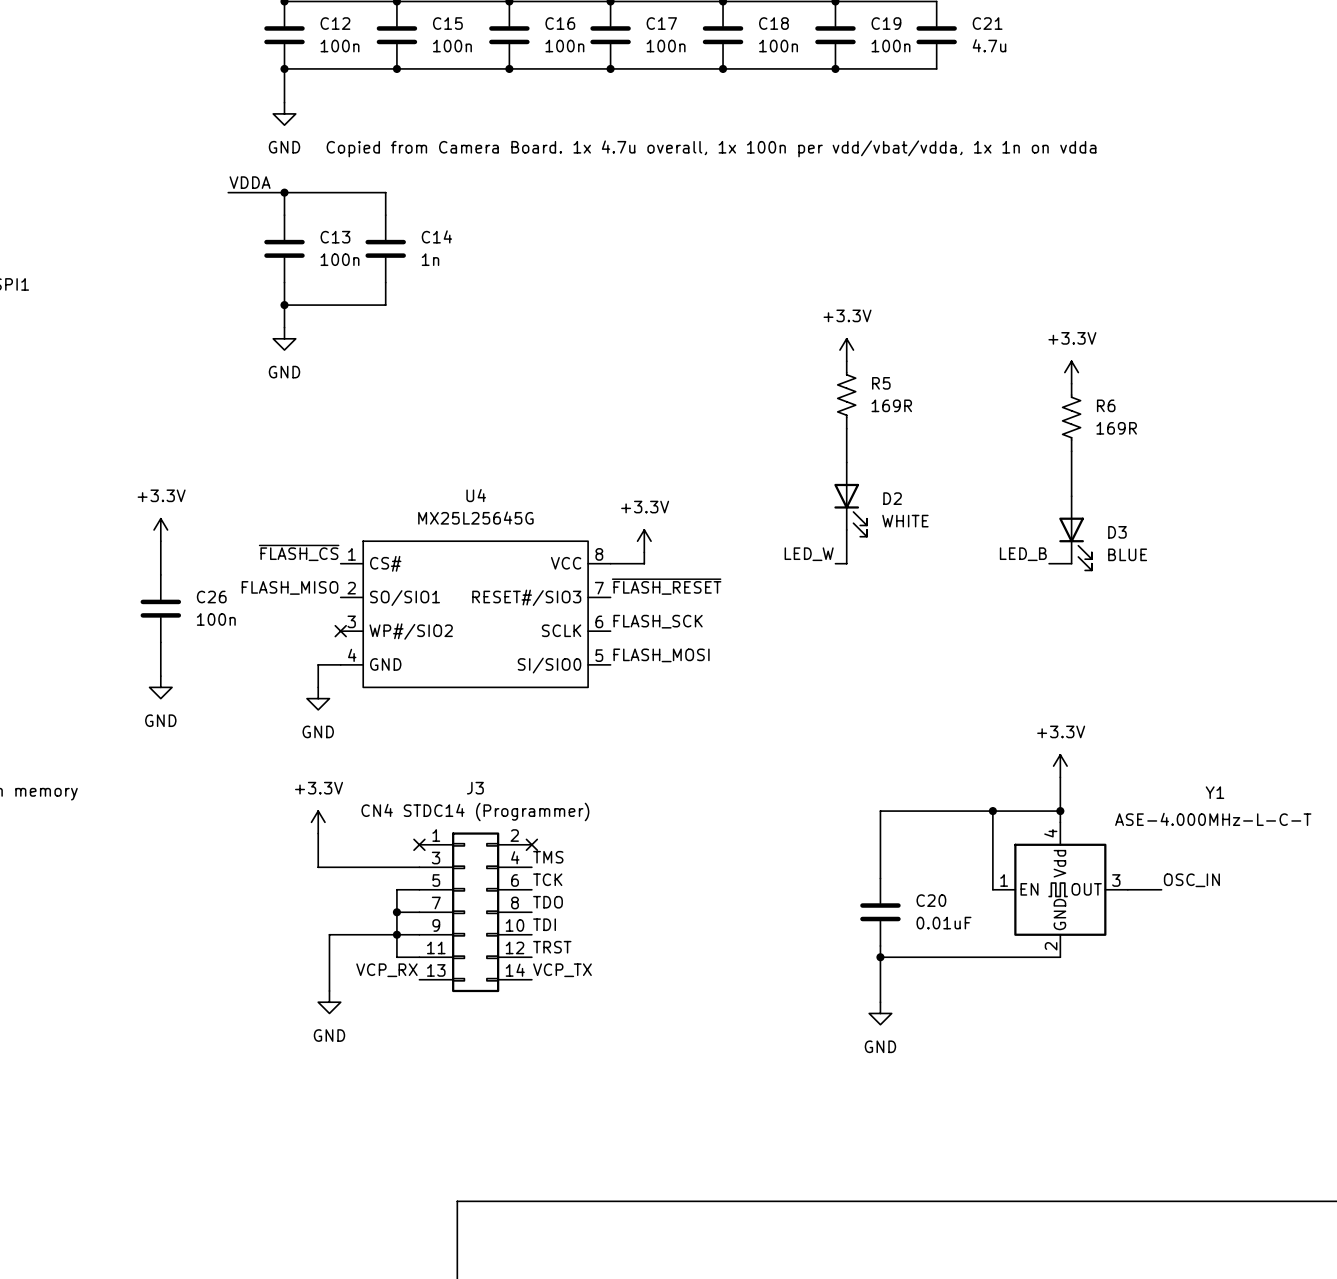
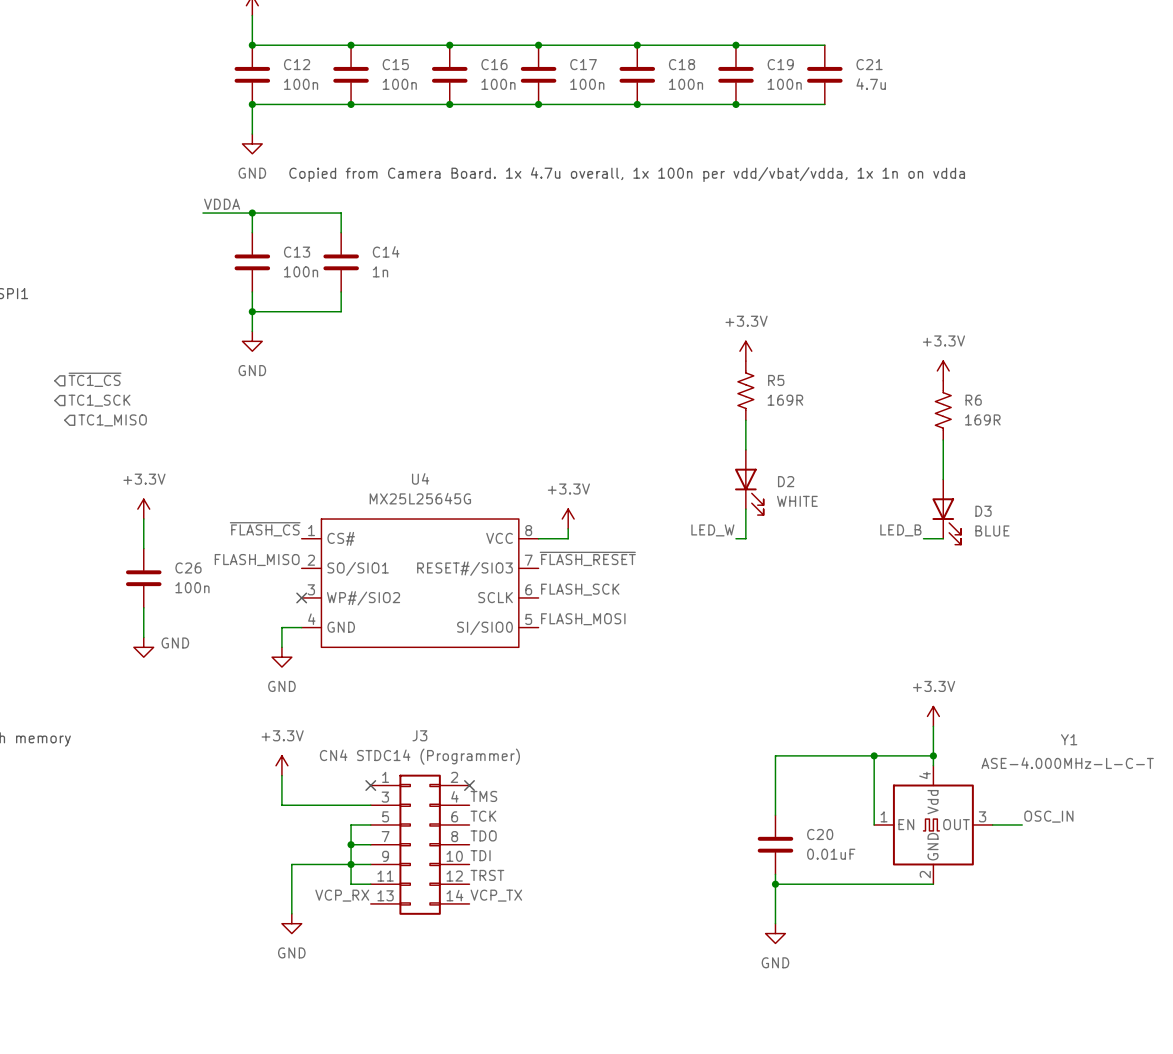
hierarchical label: none -> ~{TC1_CS} (95, 379)
hierarchical label: none -> TC1_SCK (99, 400)
hierarchical label: none -> TC1_MISO (112, 420)
power symbol text position: GND (160, 720) -> GND (175, 643)

